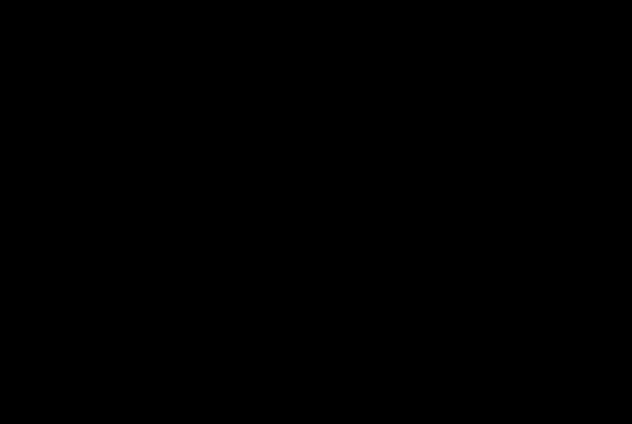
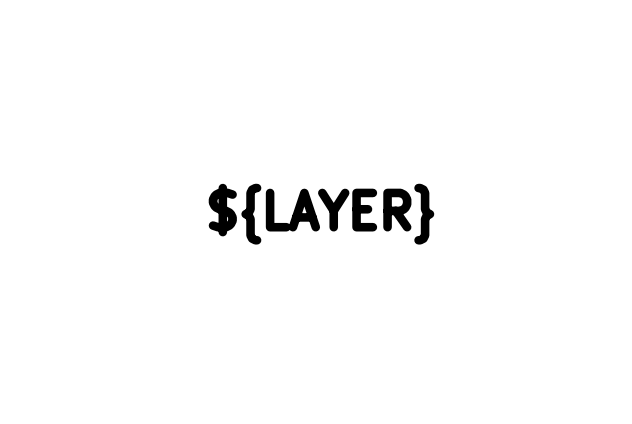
text: none -> ${LAYER} (321, 214)

